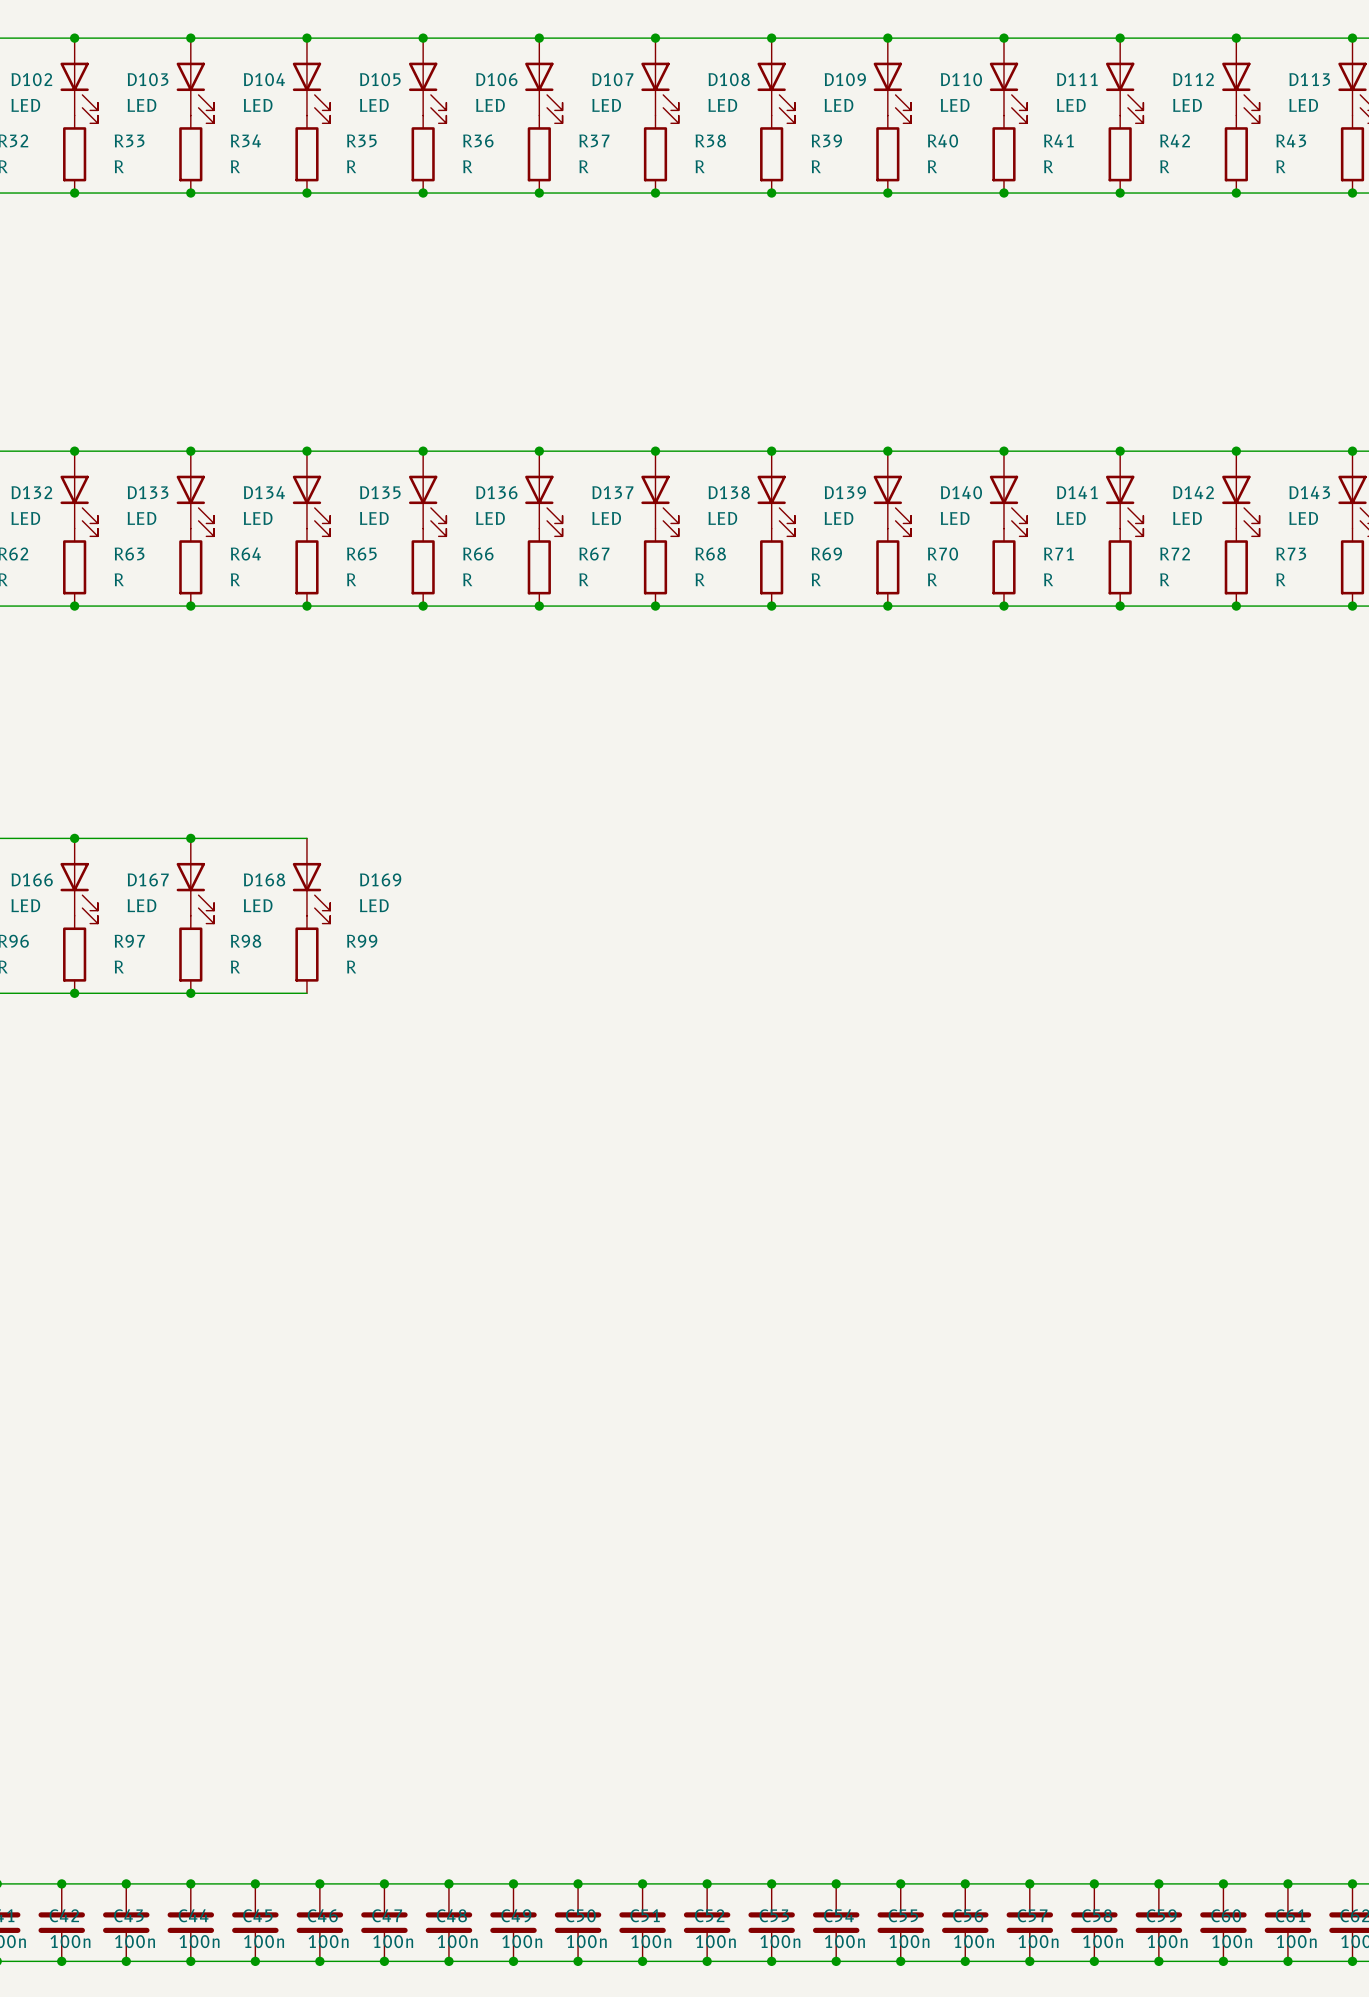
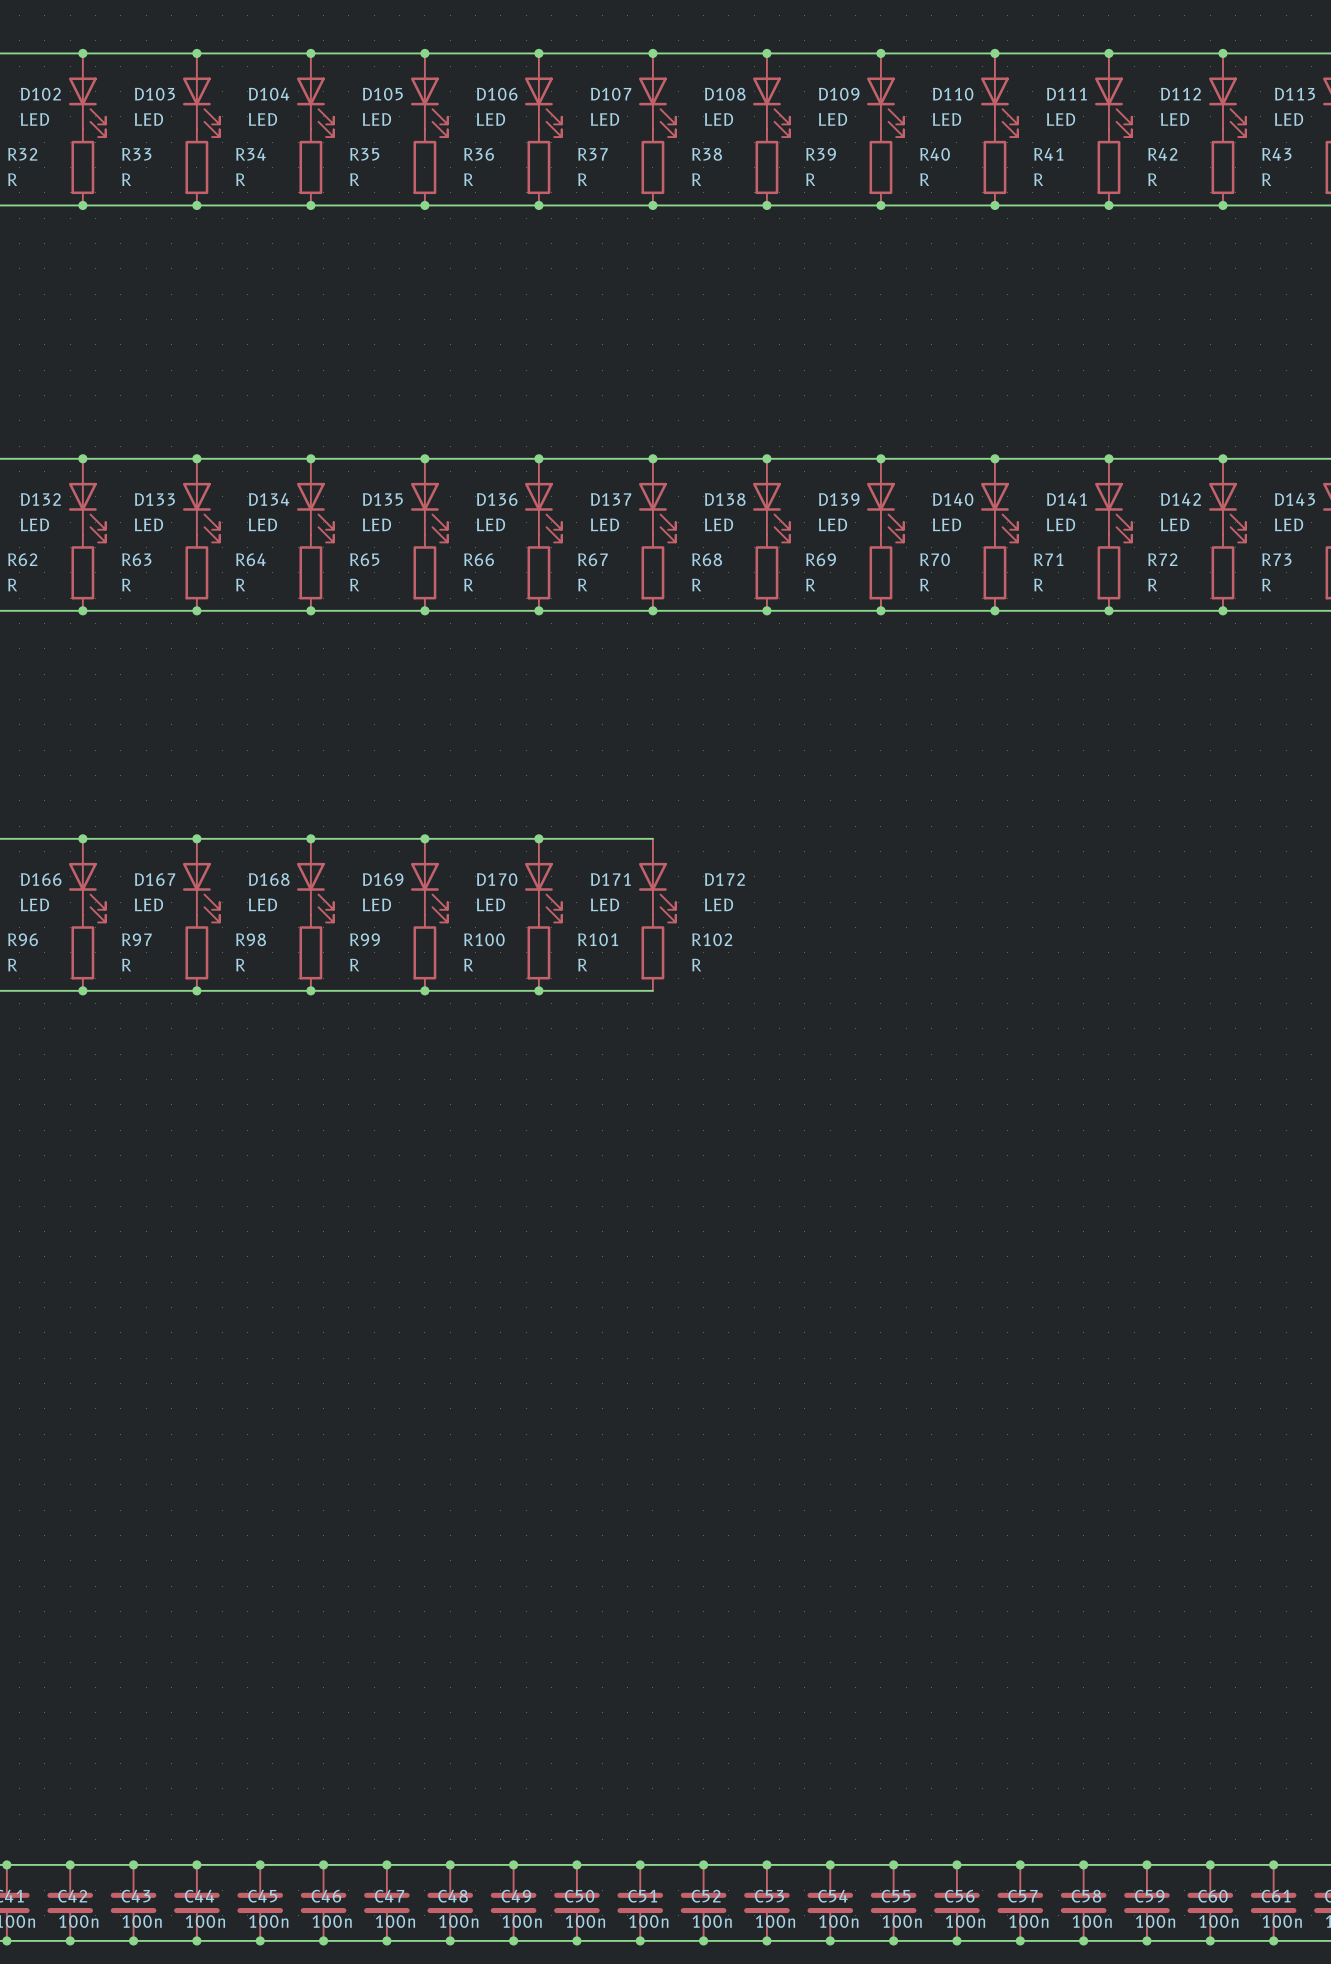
wire: none -> (310, 838) (652, 838)
junction: none -> (310, 838)
junction: none -> (424, 838)
junction: none -> (538, 838)
D170: none -> LED (429, 880)
D171: none -> LED (543, 880)
D172: none -> LED (657, 880)
R100: none -> R (424, 952)
R101: none -> R (538, 952)
R102: none -> R (652, 952)
wire: none -> (310, 990) (652, 990)
junction: none -> (310, 990)
junction: none -> (424, 990)
junction: none -> (538, 990)

